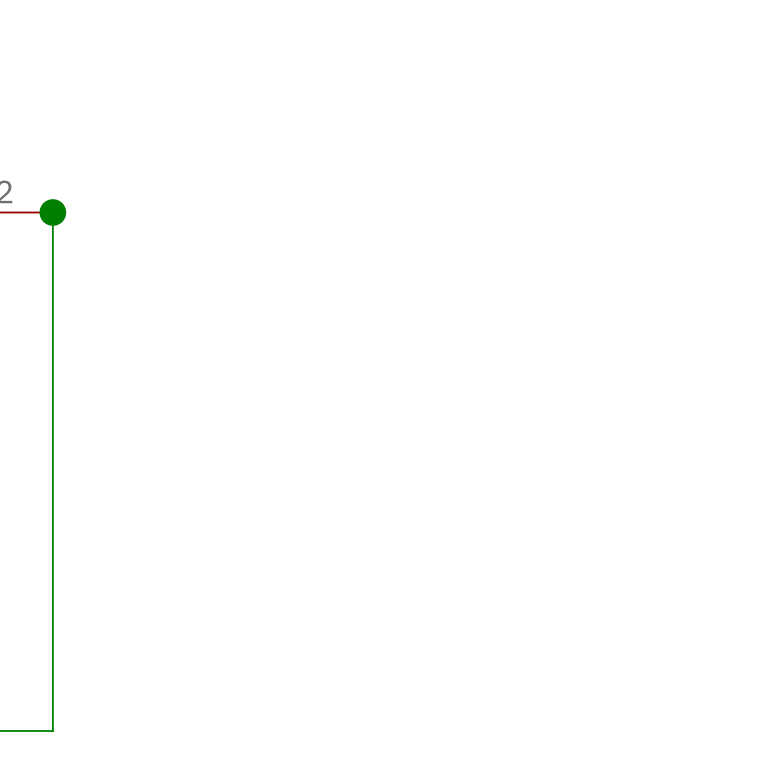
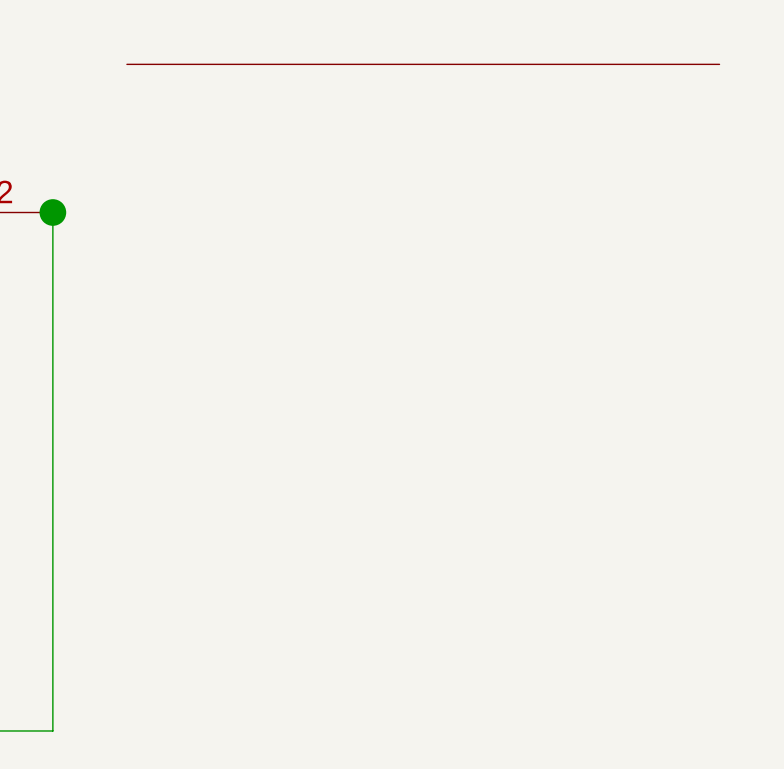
part: none -> (423, 64)

